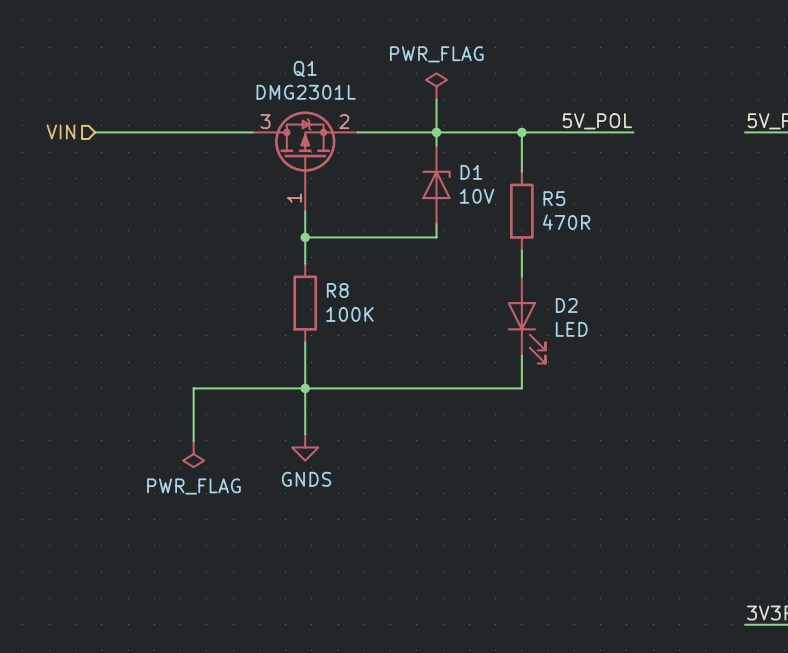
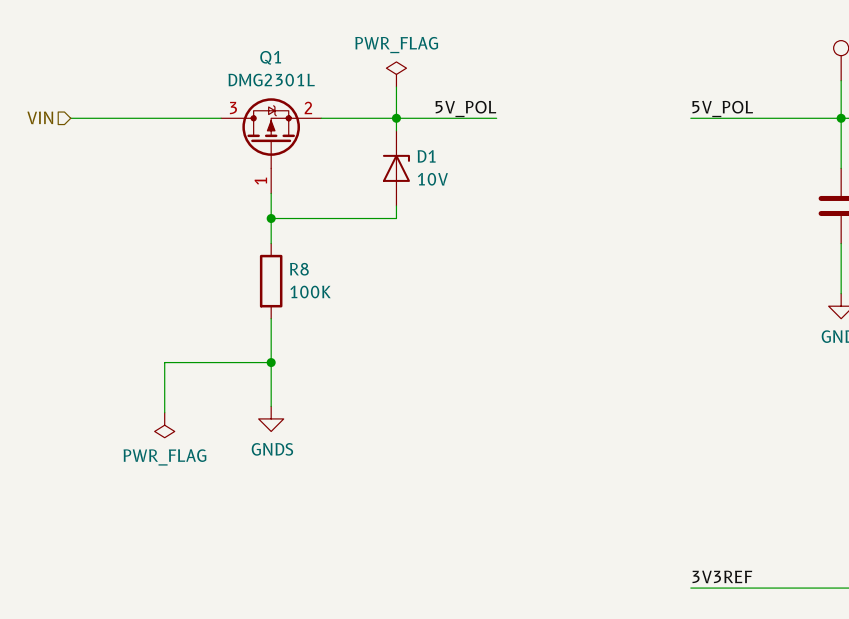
label position: 5V_POL (597, 121) -> 5V_POL (465, 108)
wire: (521, 132) (521, 171) -> none
junction: (521, 132) -> none
wire: (541, 132) (633, 132) -> none
R5: 470R (521, 211) -> none
wire: (521, 250) (521, 276) -> none
D2: LED (526, 320) -> none
wire: (521, 355) (521, 388) (305, 388) -> none

